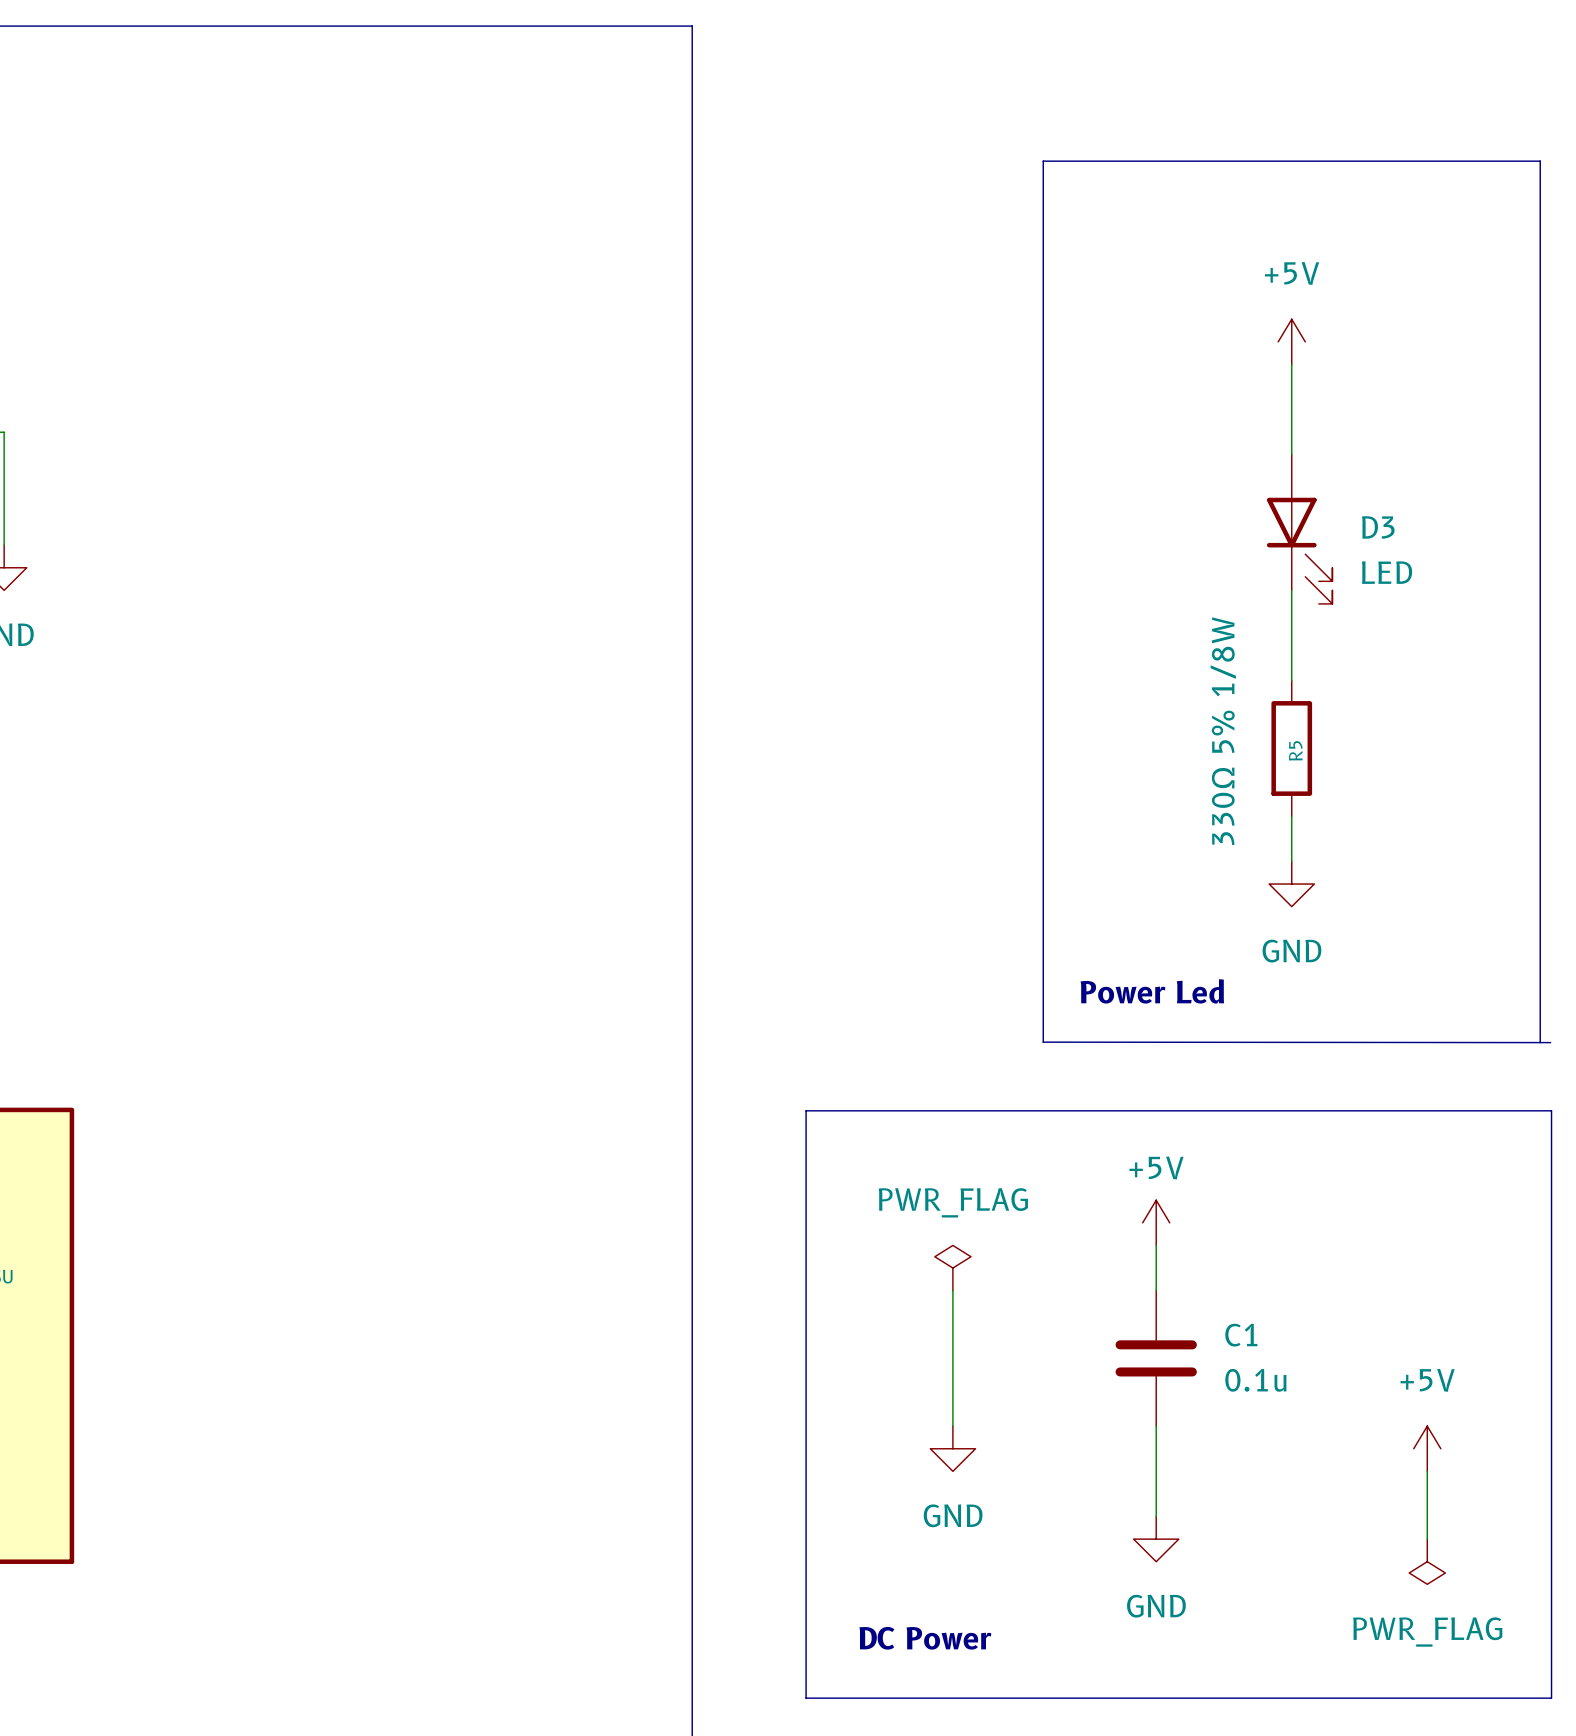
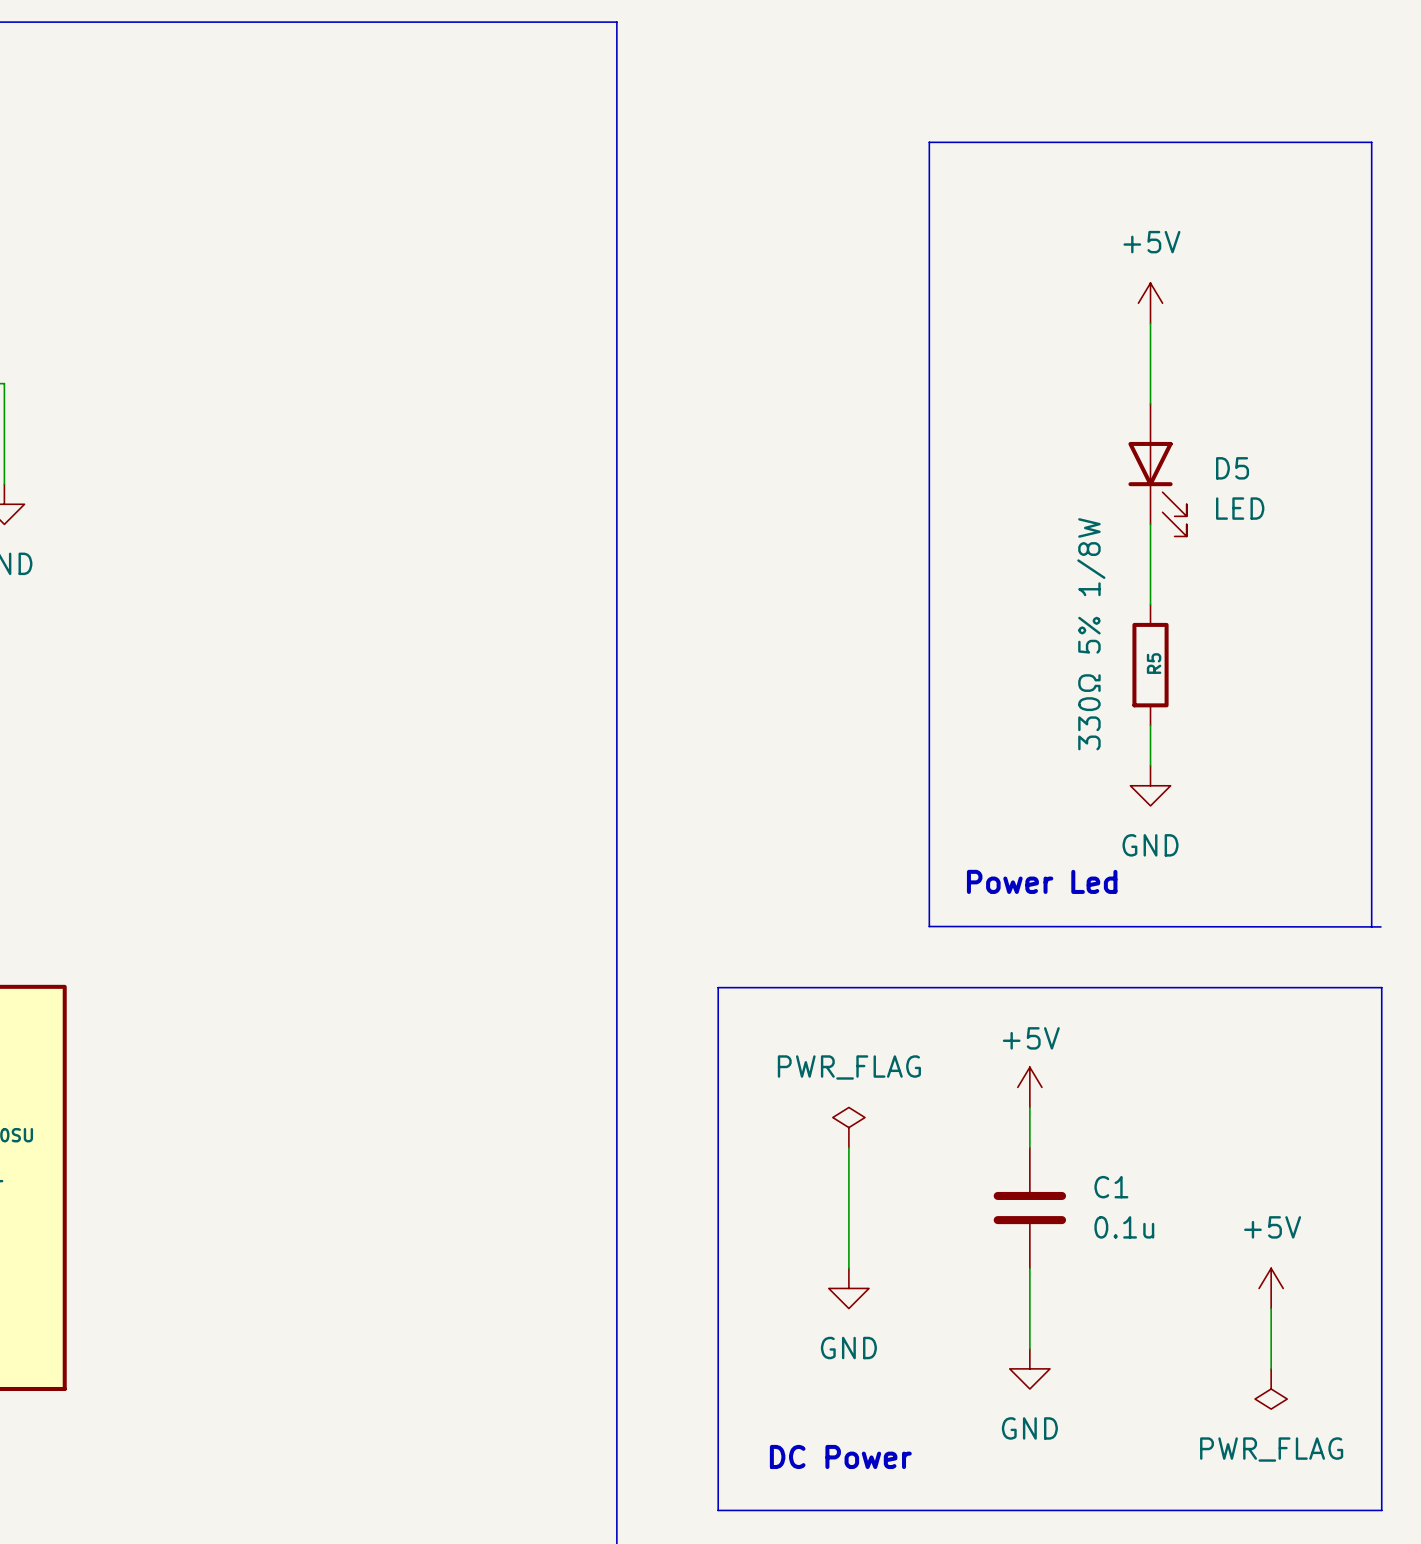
D3 name: D3 (1378, 527) -> D5 (1232, 468)

